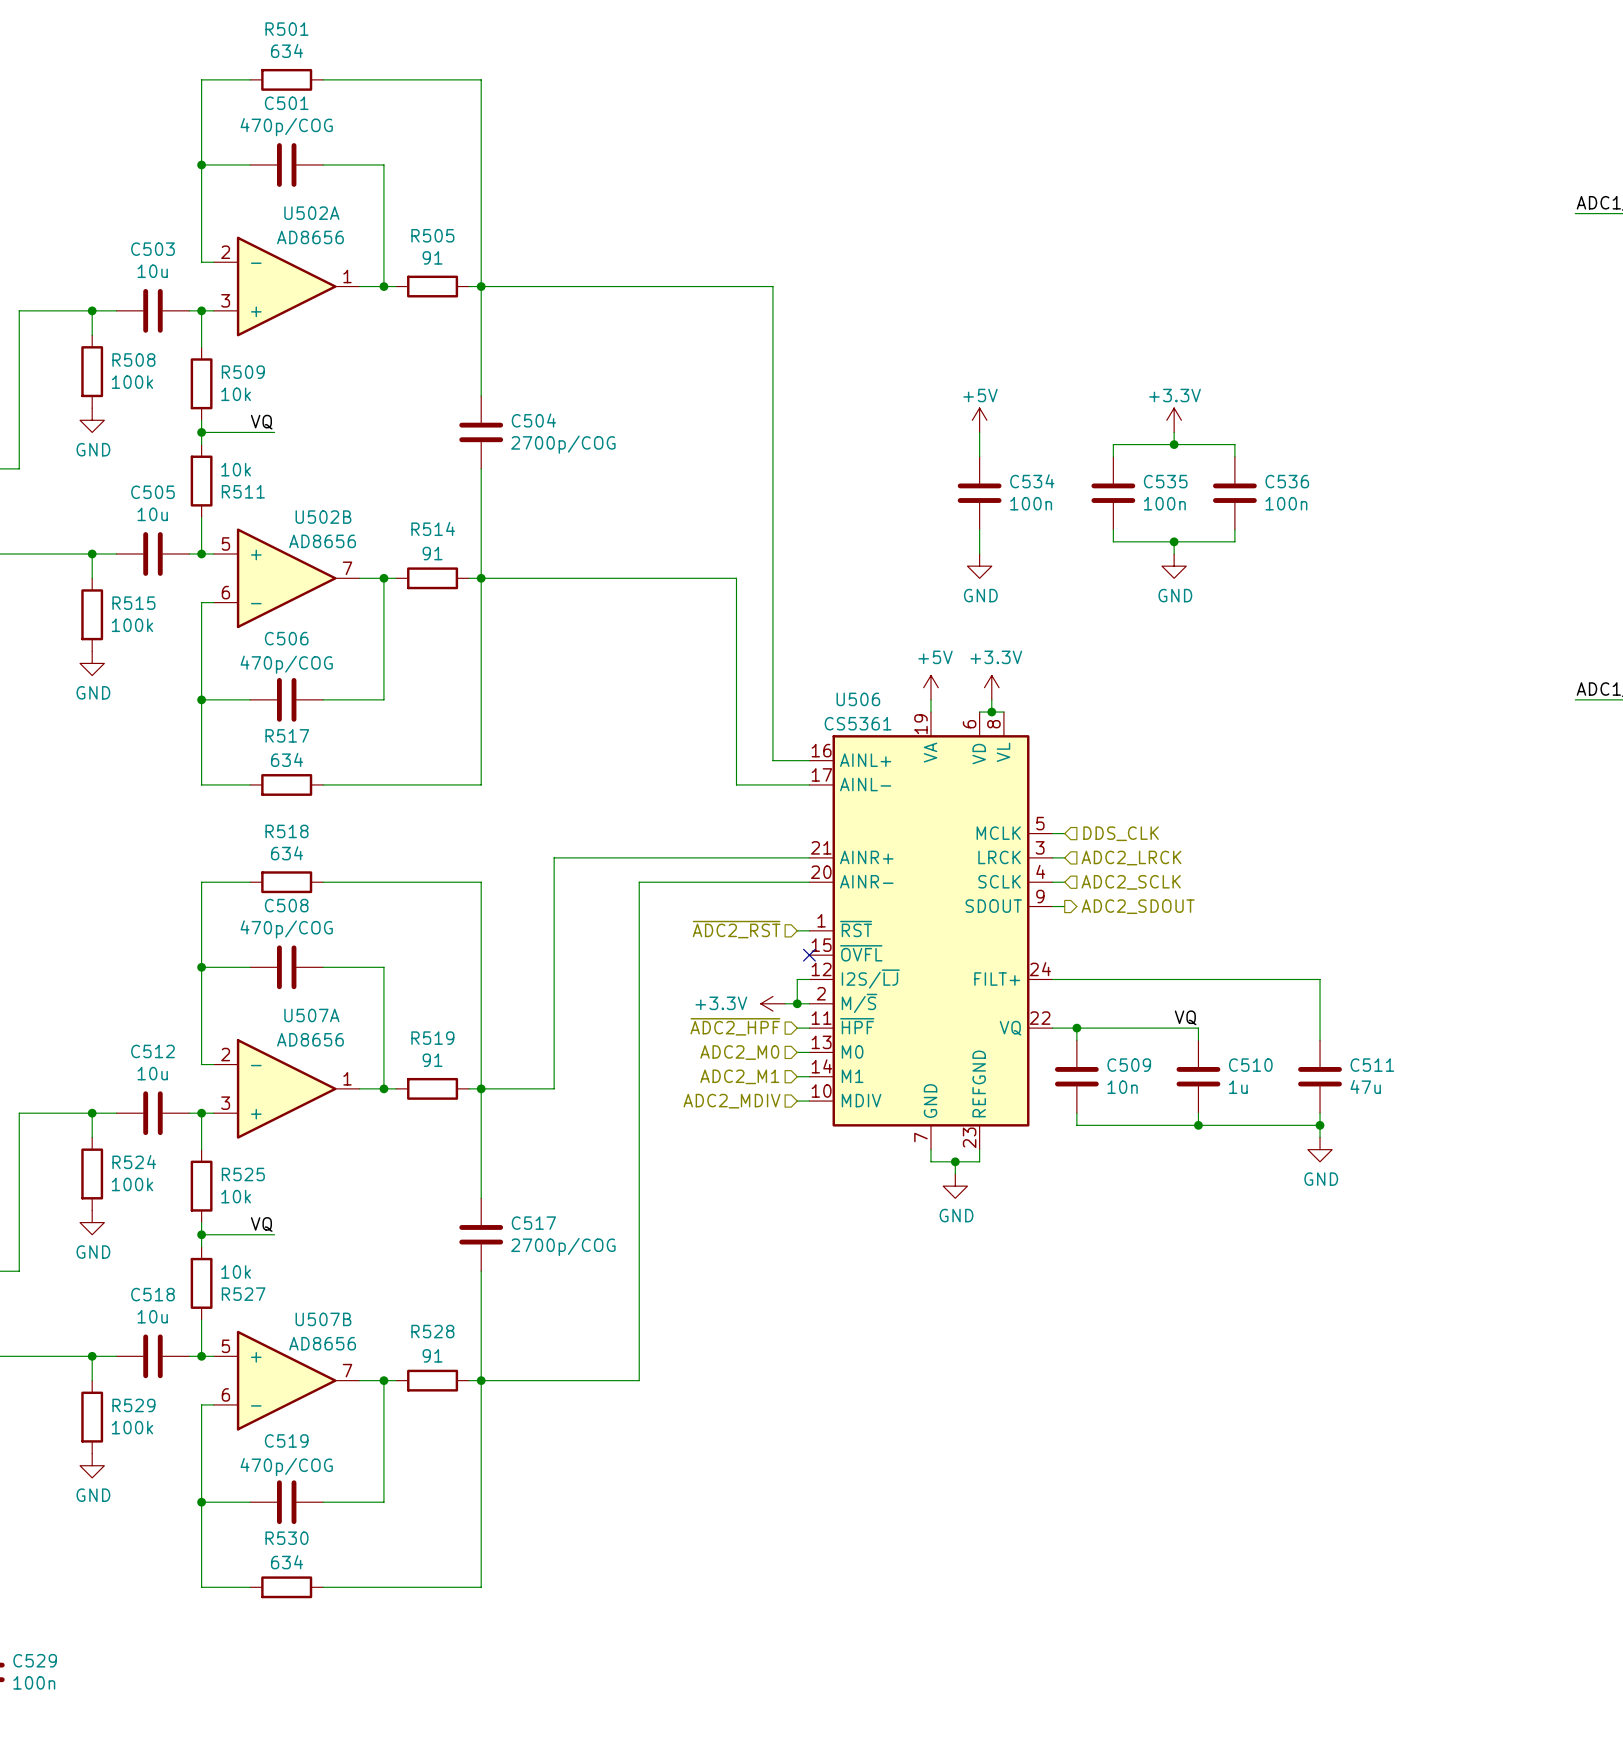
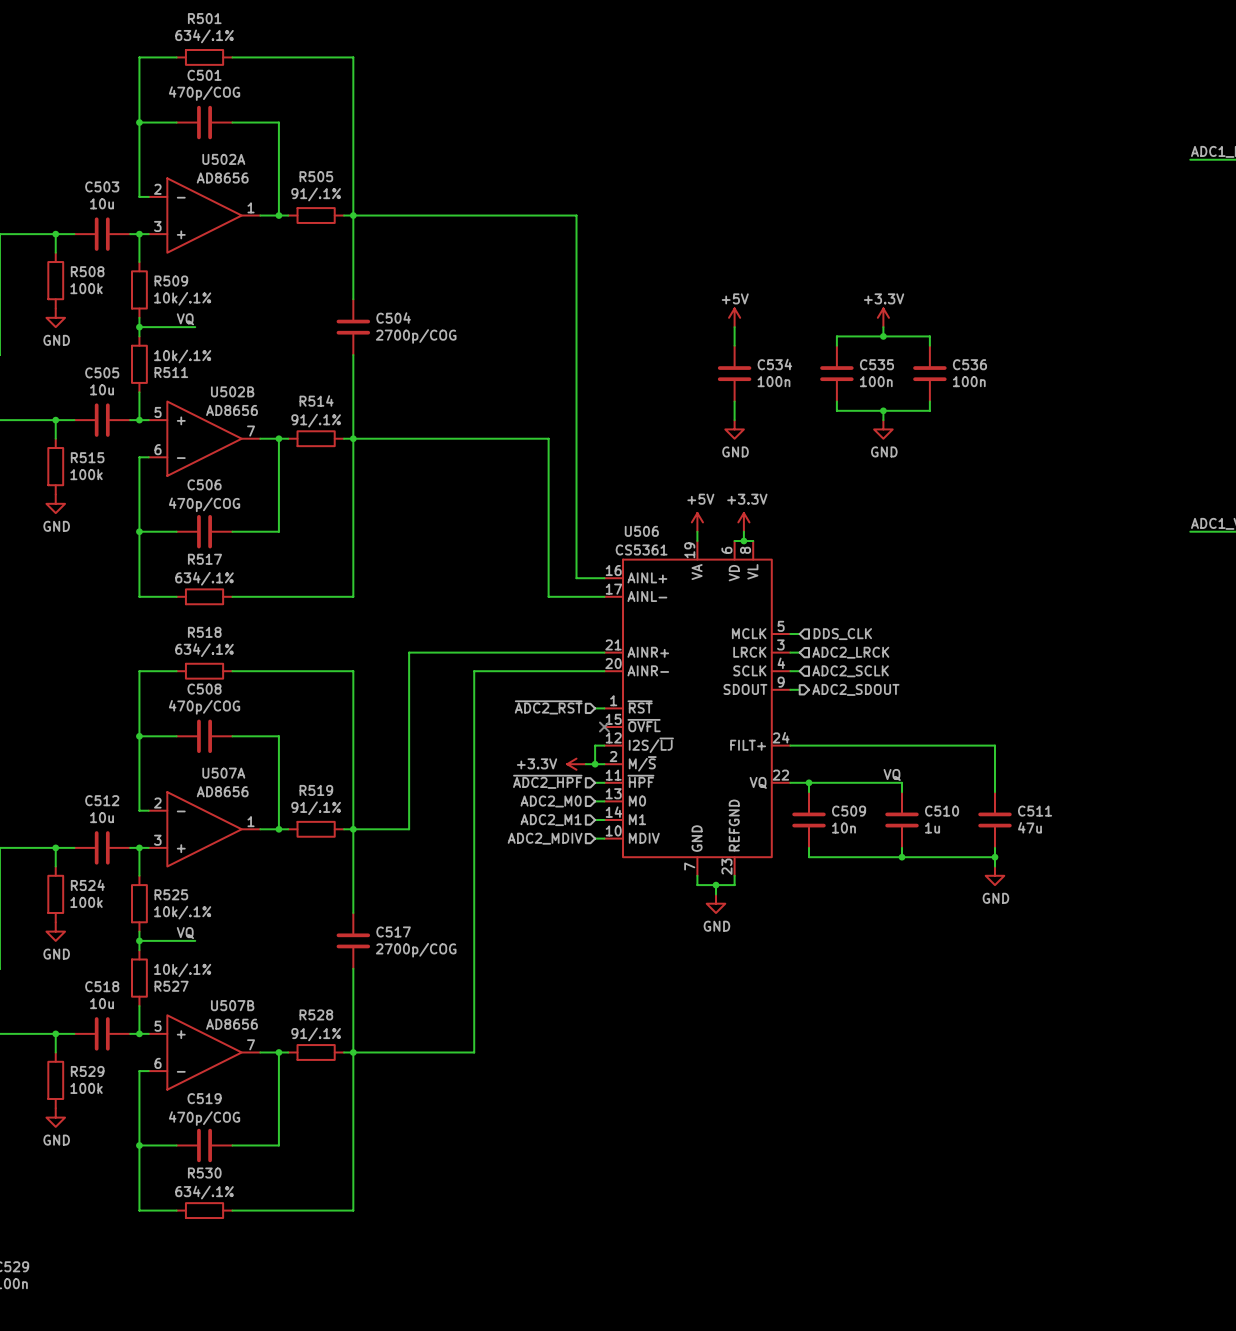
R501 value: 634 (286, 50) -> 634/.1% (204, 36)
R505 value: 91 (432, 257) -> 91/.1% (316, 194)
R509 value: 10k (236, 394) -> 10k/.1% (182, 298)
R511 value: 10k (236, 469) -> 10k/.1% (182, 356)
R514 value: 91 (432, 553) -> 91/.1% (316, 420)
R517 value: 634 (286, 759) -> 634/.1% (204, 578)
R518 value: 634 (286, 853) -> 634/.1% (204, 650)
R519 value: 91 (432, 1060) -> 91/.1% (316, 808)
R525 value: 10k (236, 1196) -> 10k/.1% (182, 912)
R527 value: 10k (236, 1271) -> 10k/.1% (182, 970)
R528 value: 91 (432, 1355) -> 91/.1% (316, 1034)
R530 value: 634 (286, 1562) -> 634/.1% (204, 1192)

